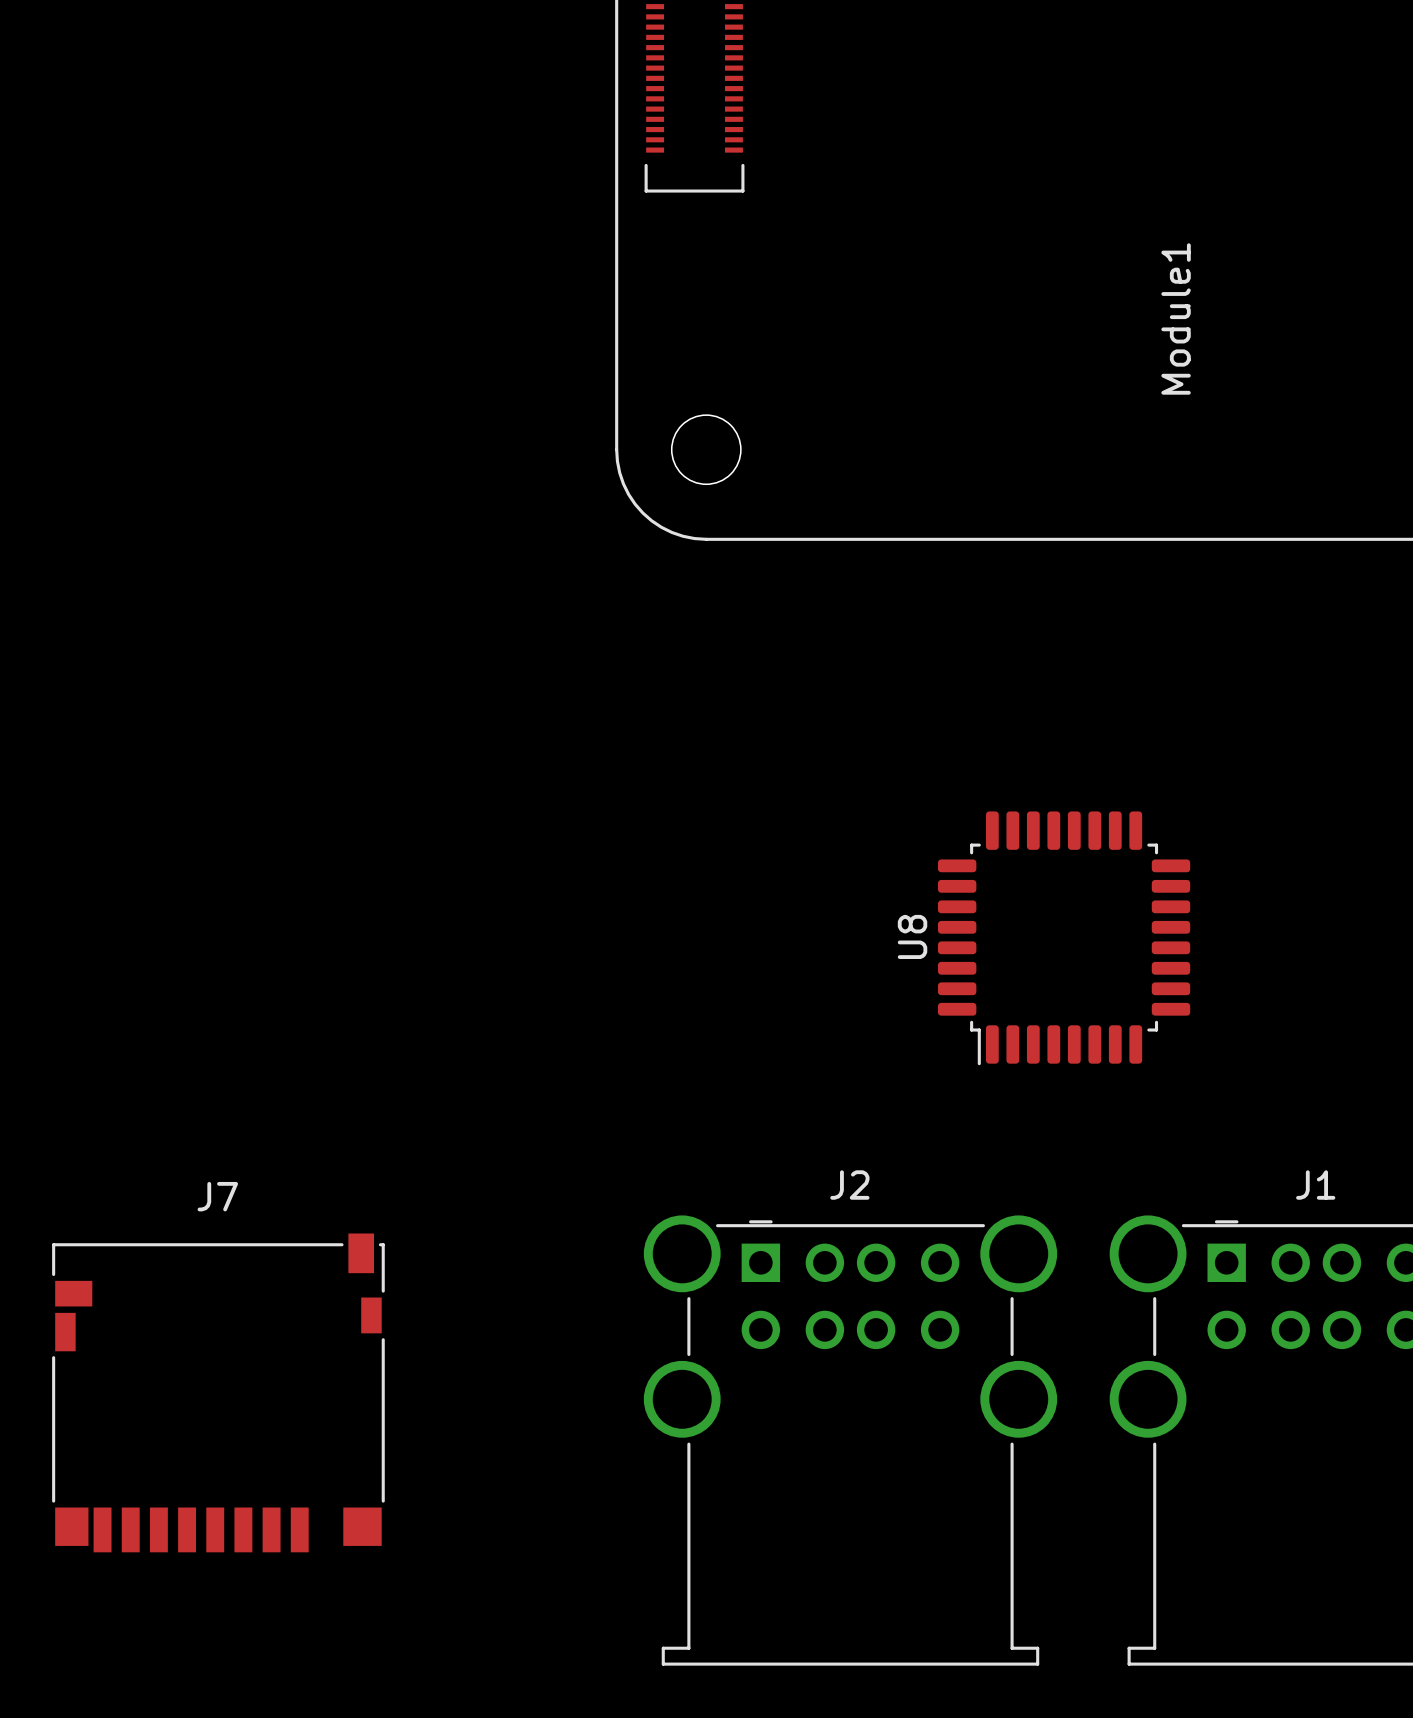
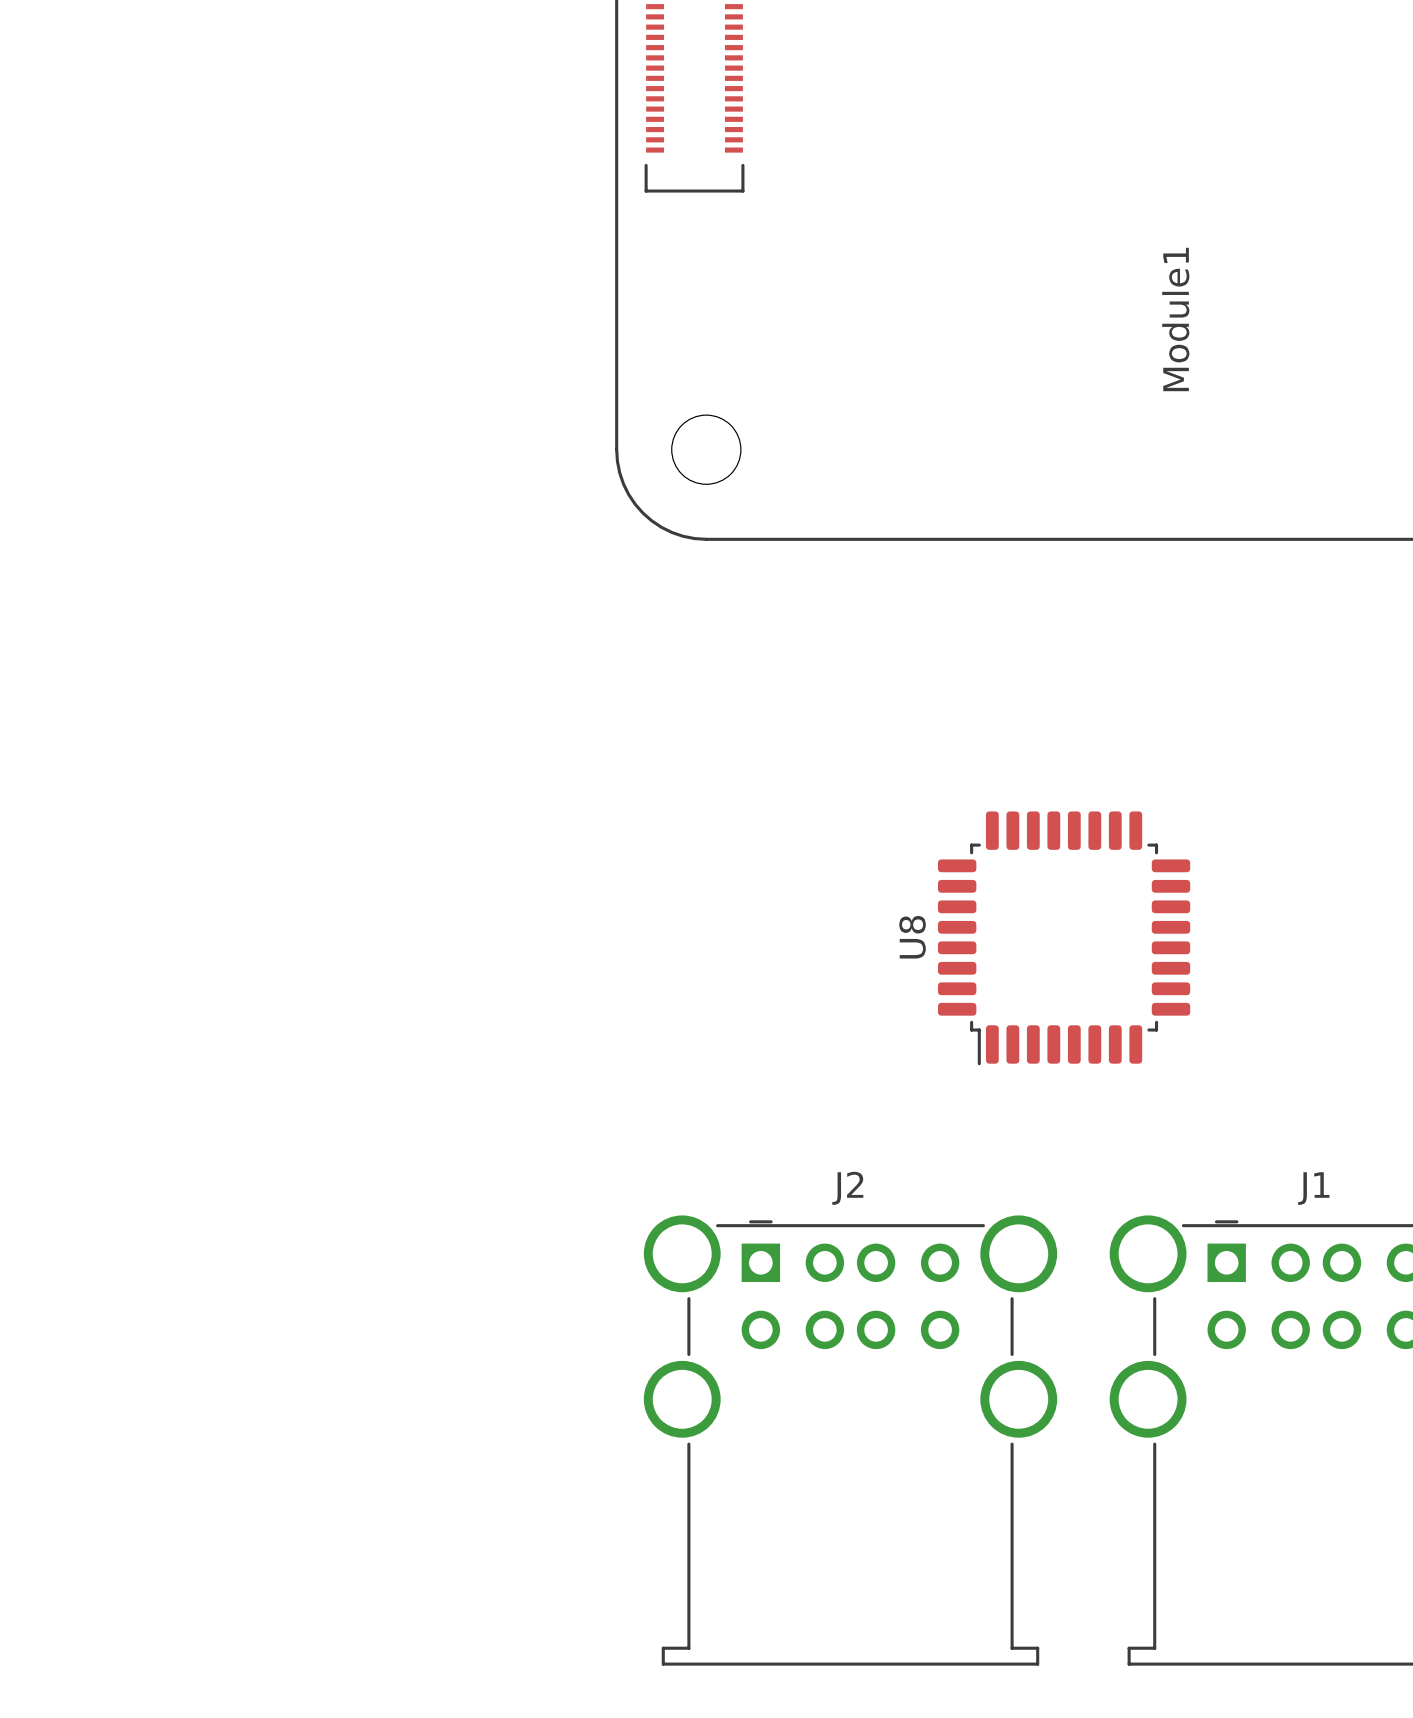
J7: (218, 1392) -> none

